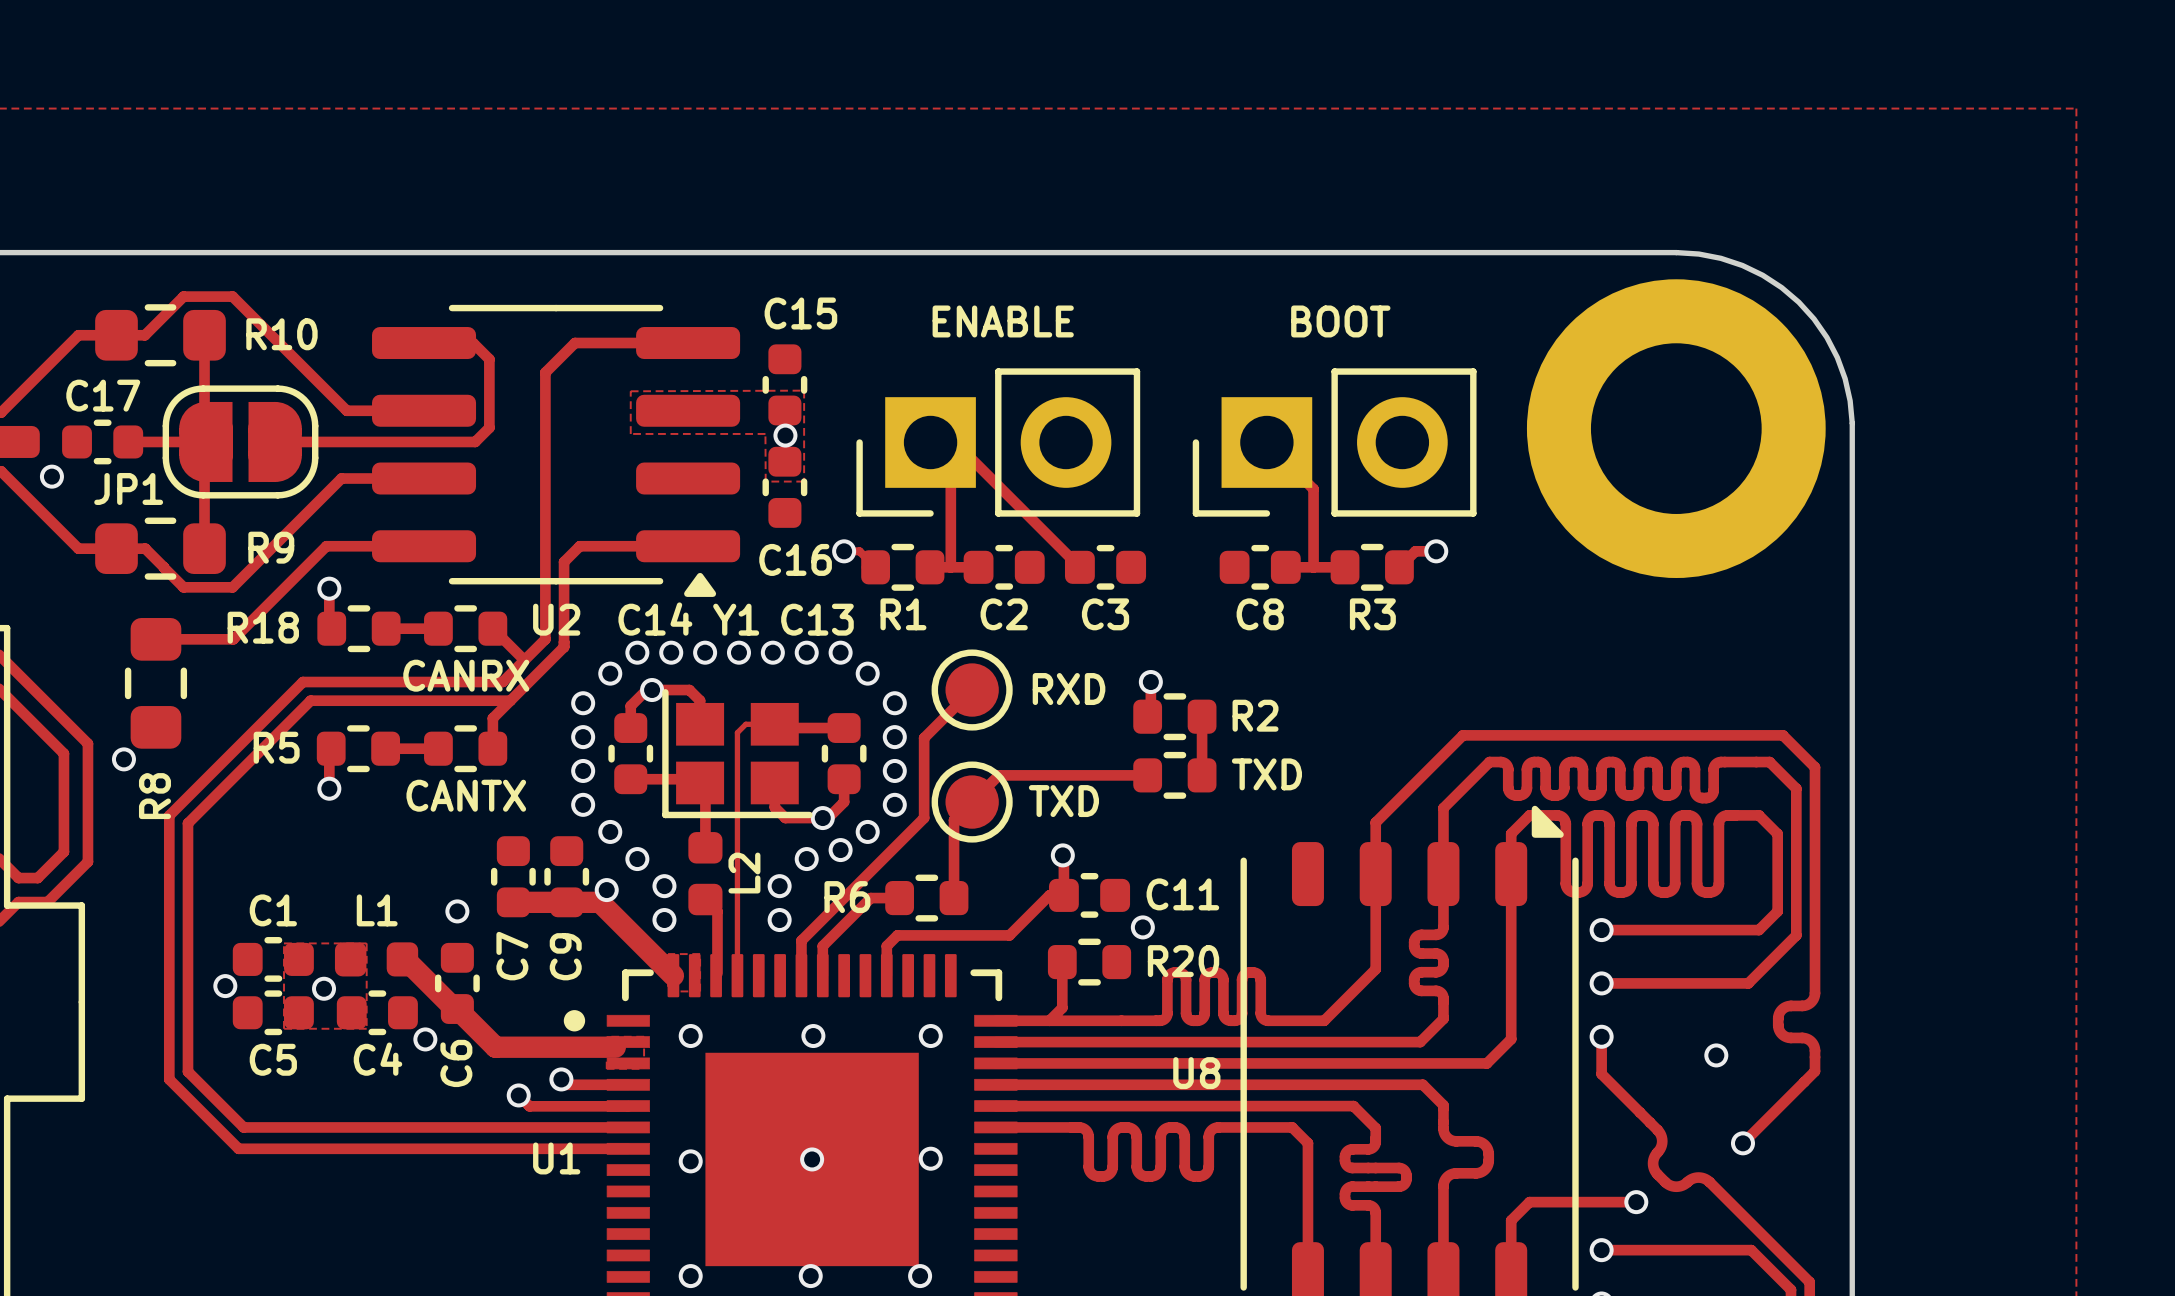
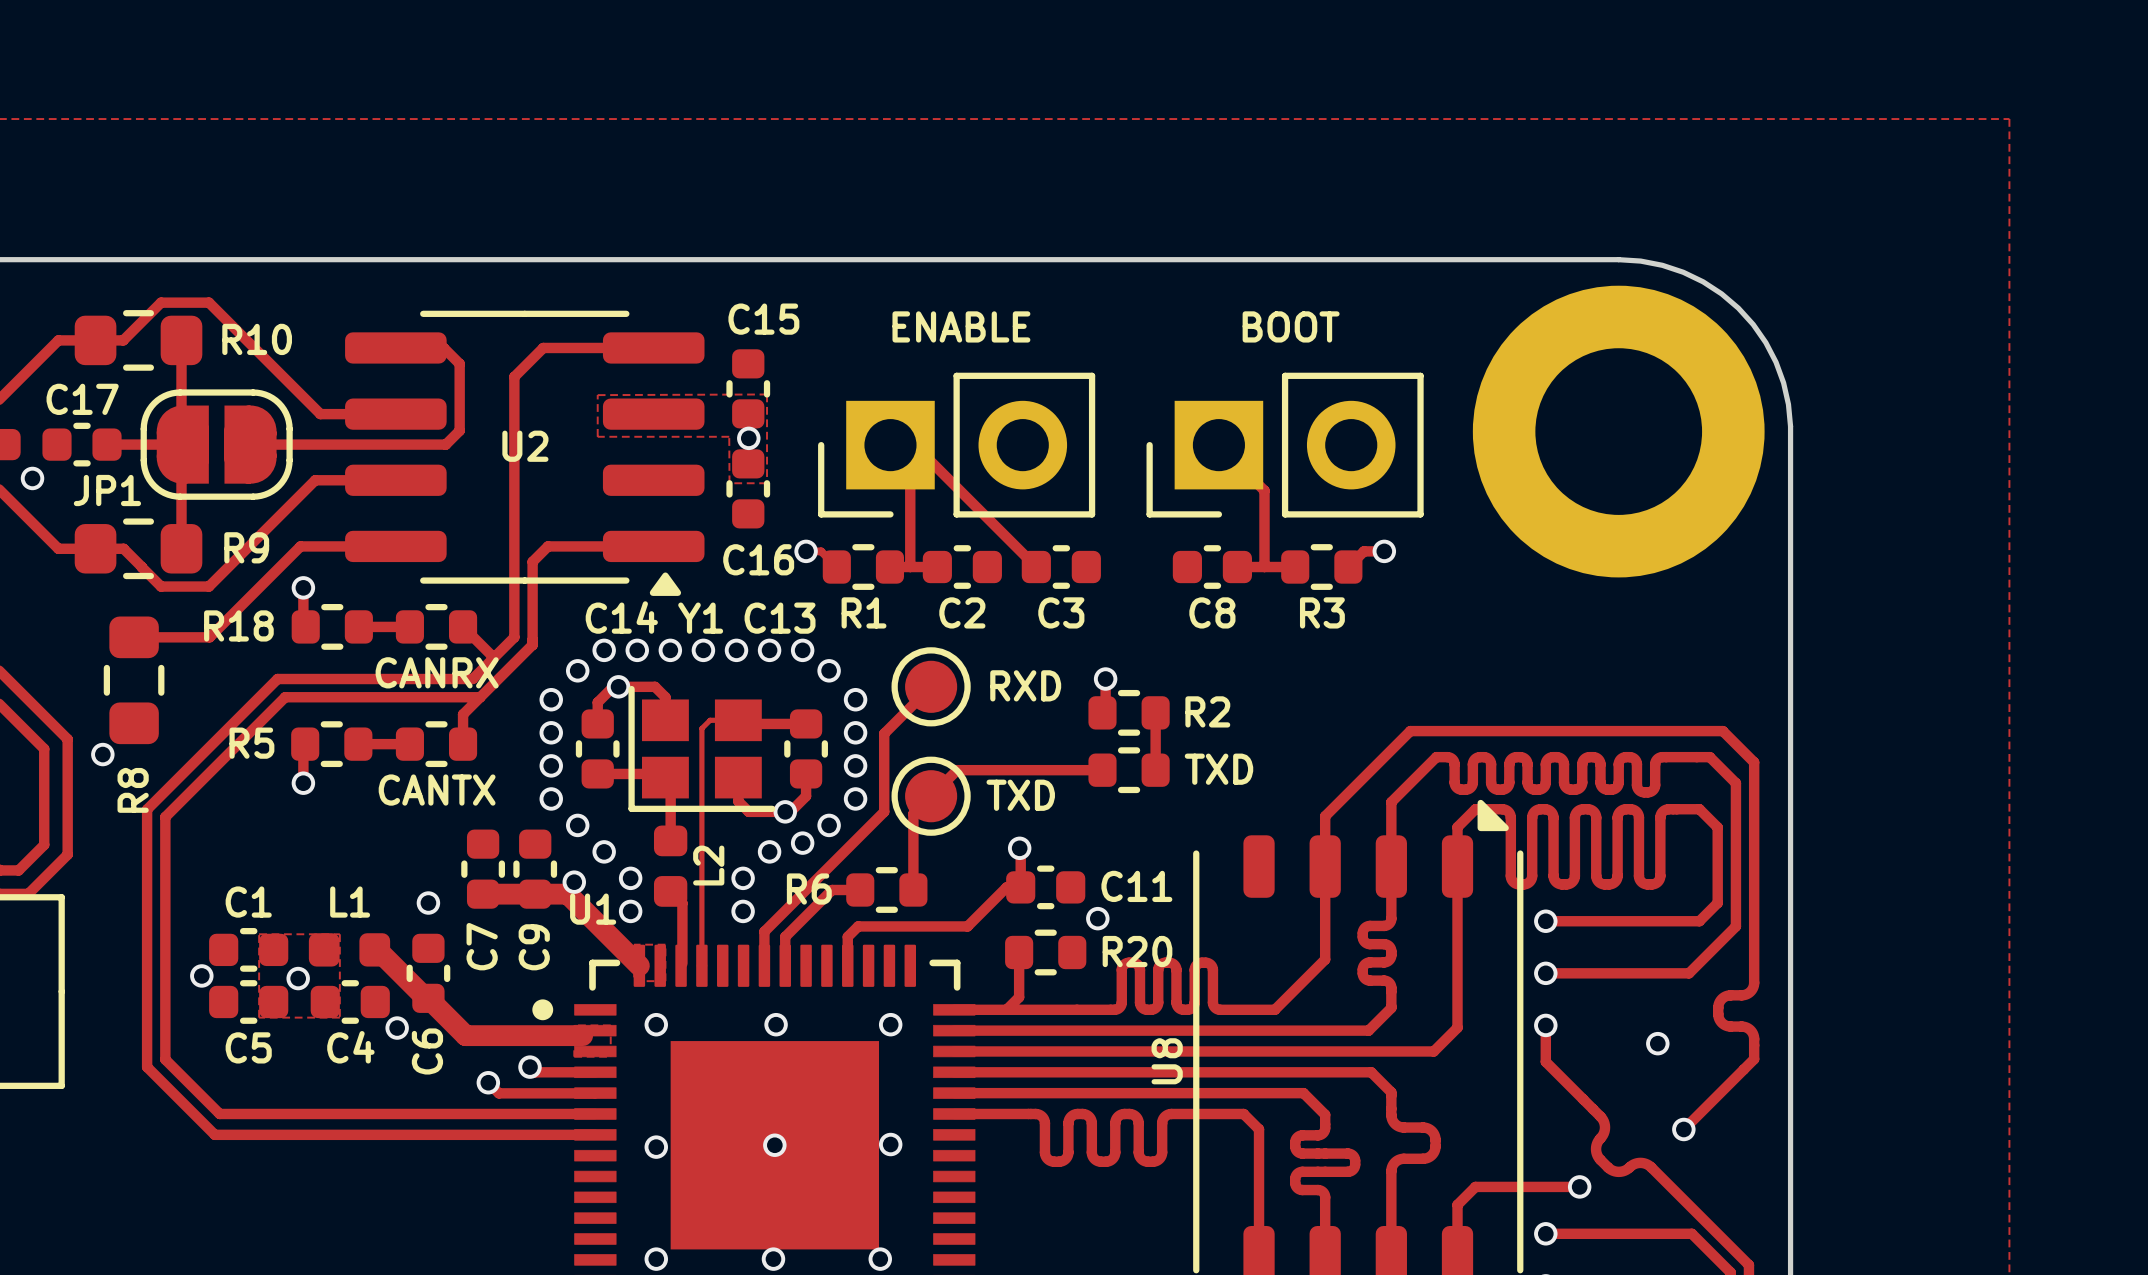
U2 name position: U2 (556, 619) -> U2 (525, 446)
U8 name rotation: 0° (1196, 1073) -> 90° counterclockwise (1167, 1061)
U1 name position: U1 (556, 1158) -> U1 (593, 909)

